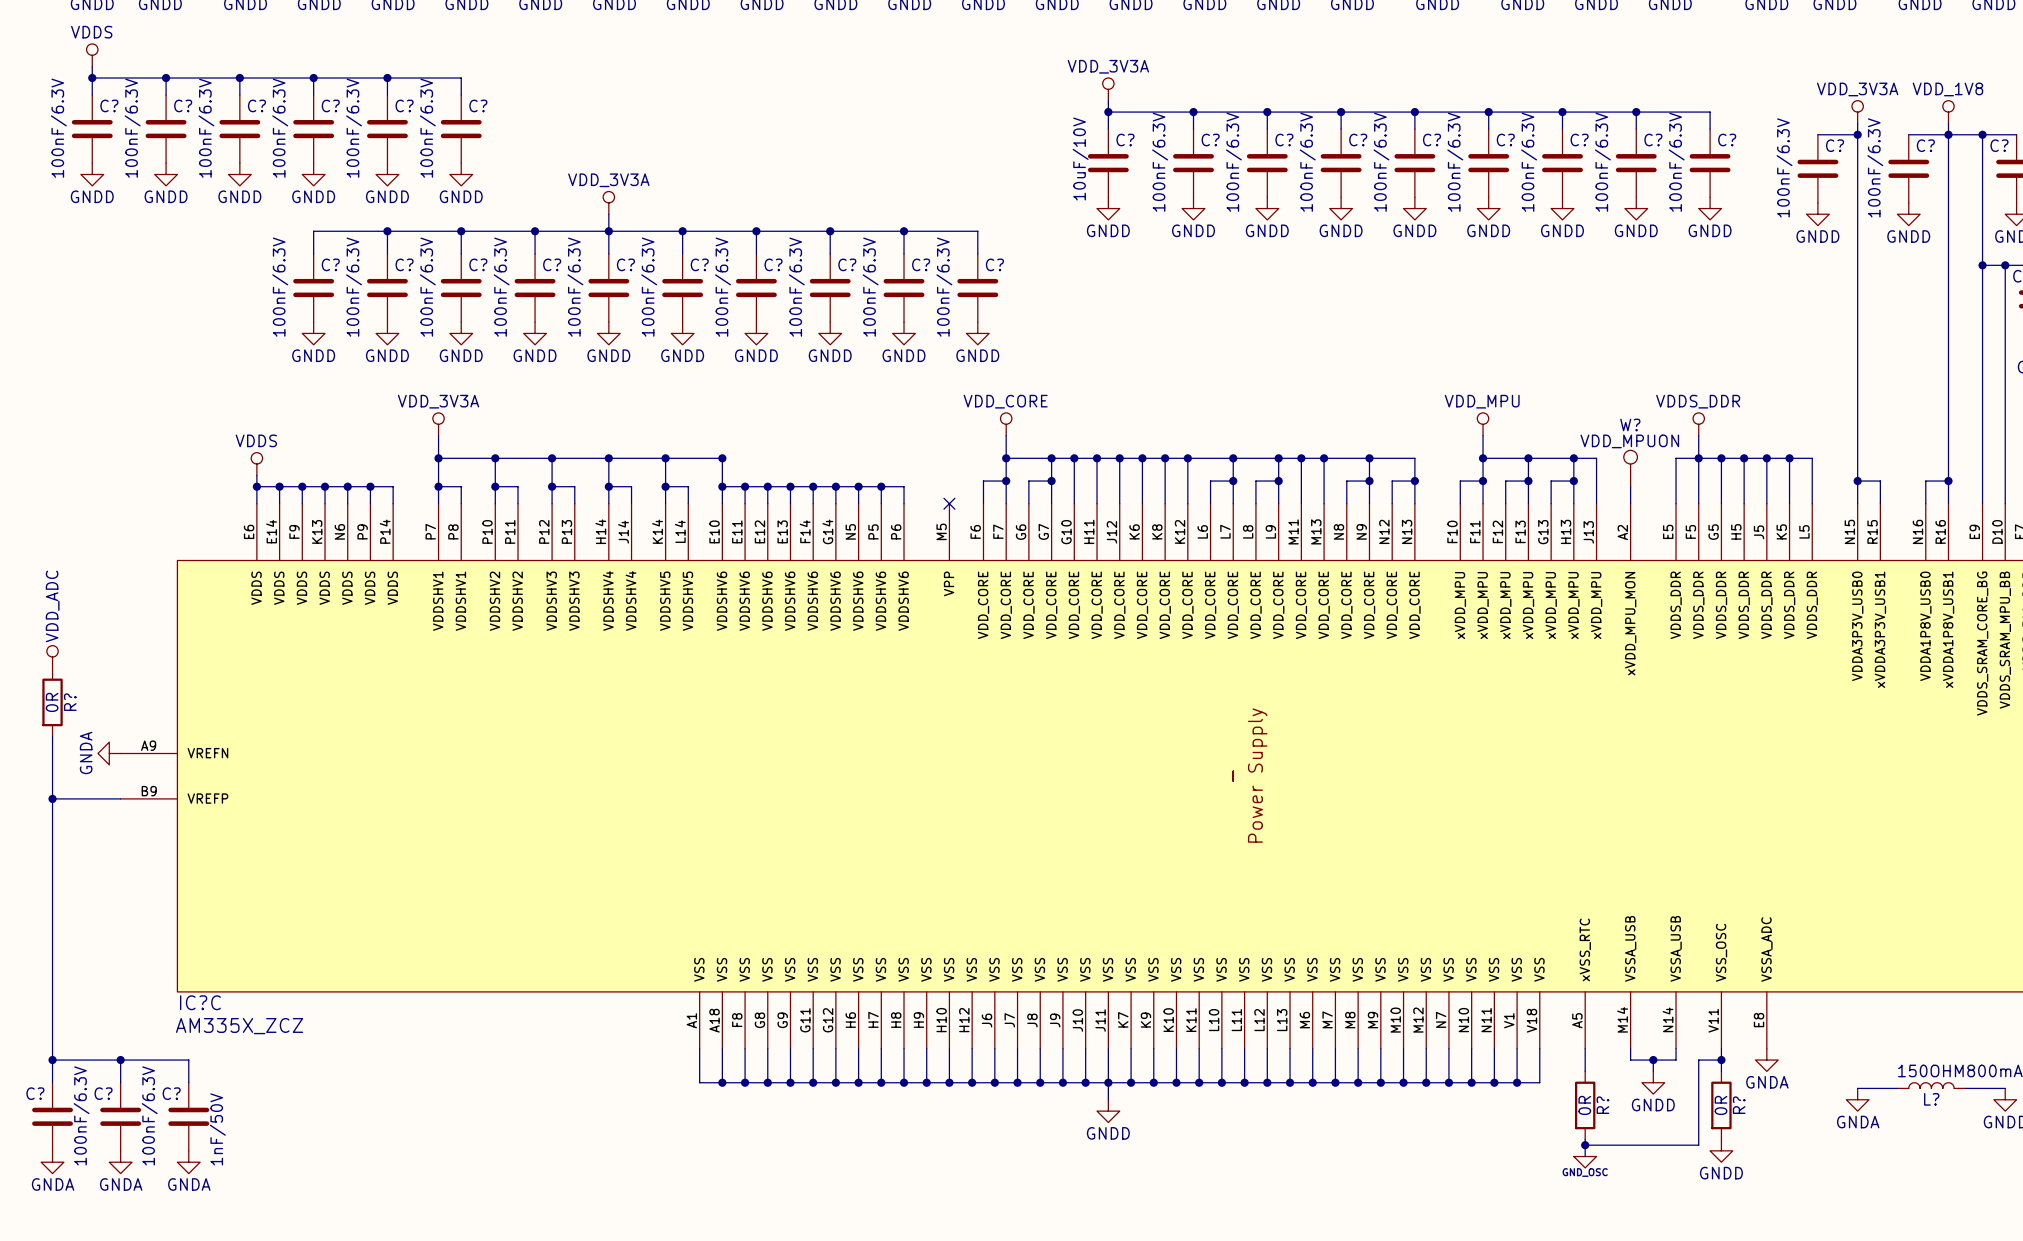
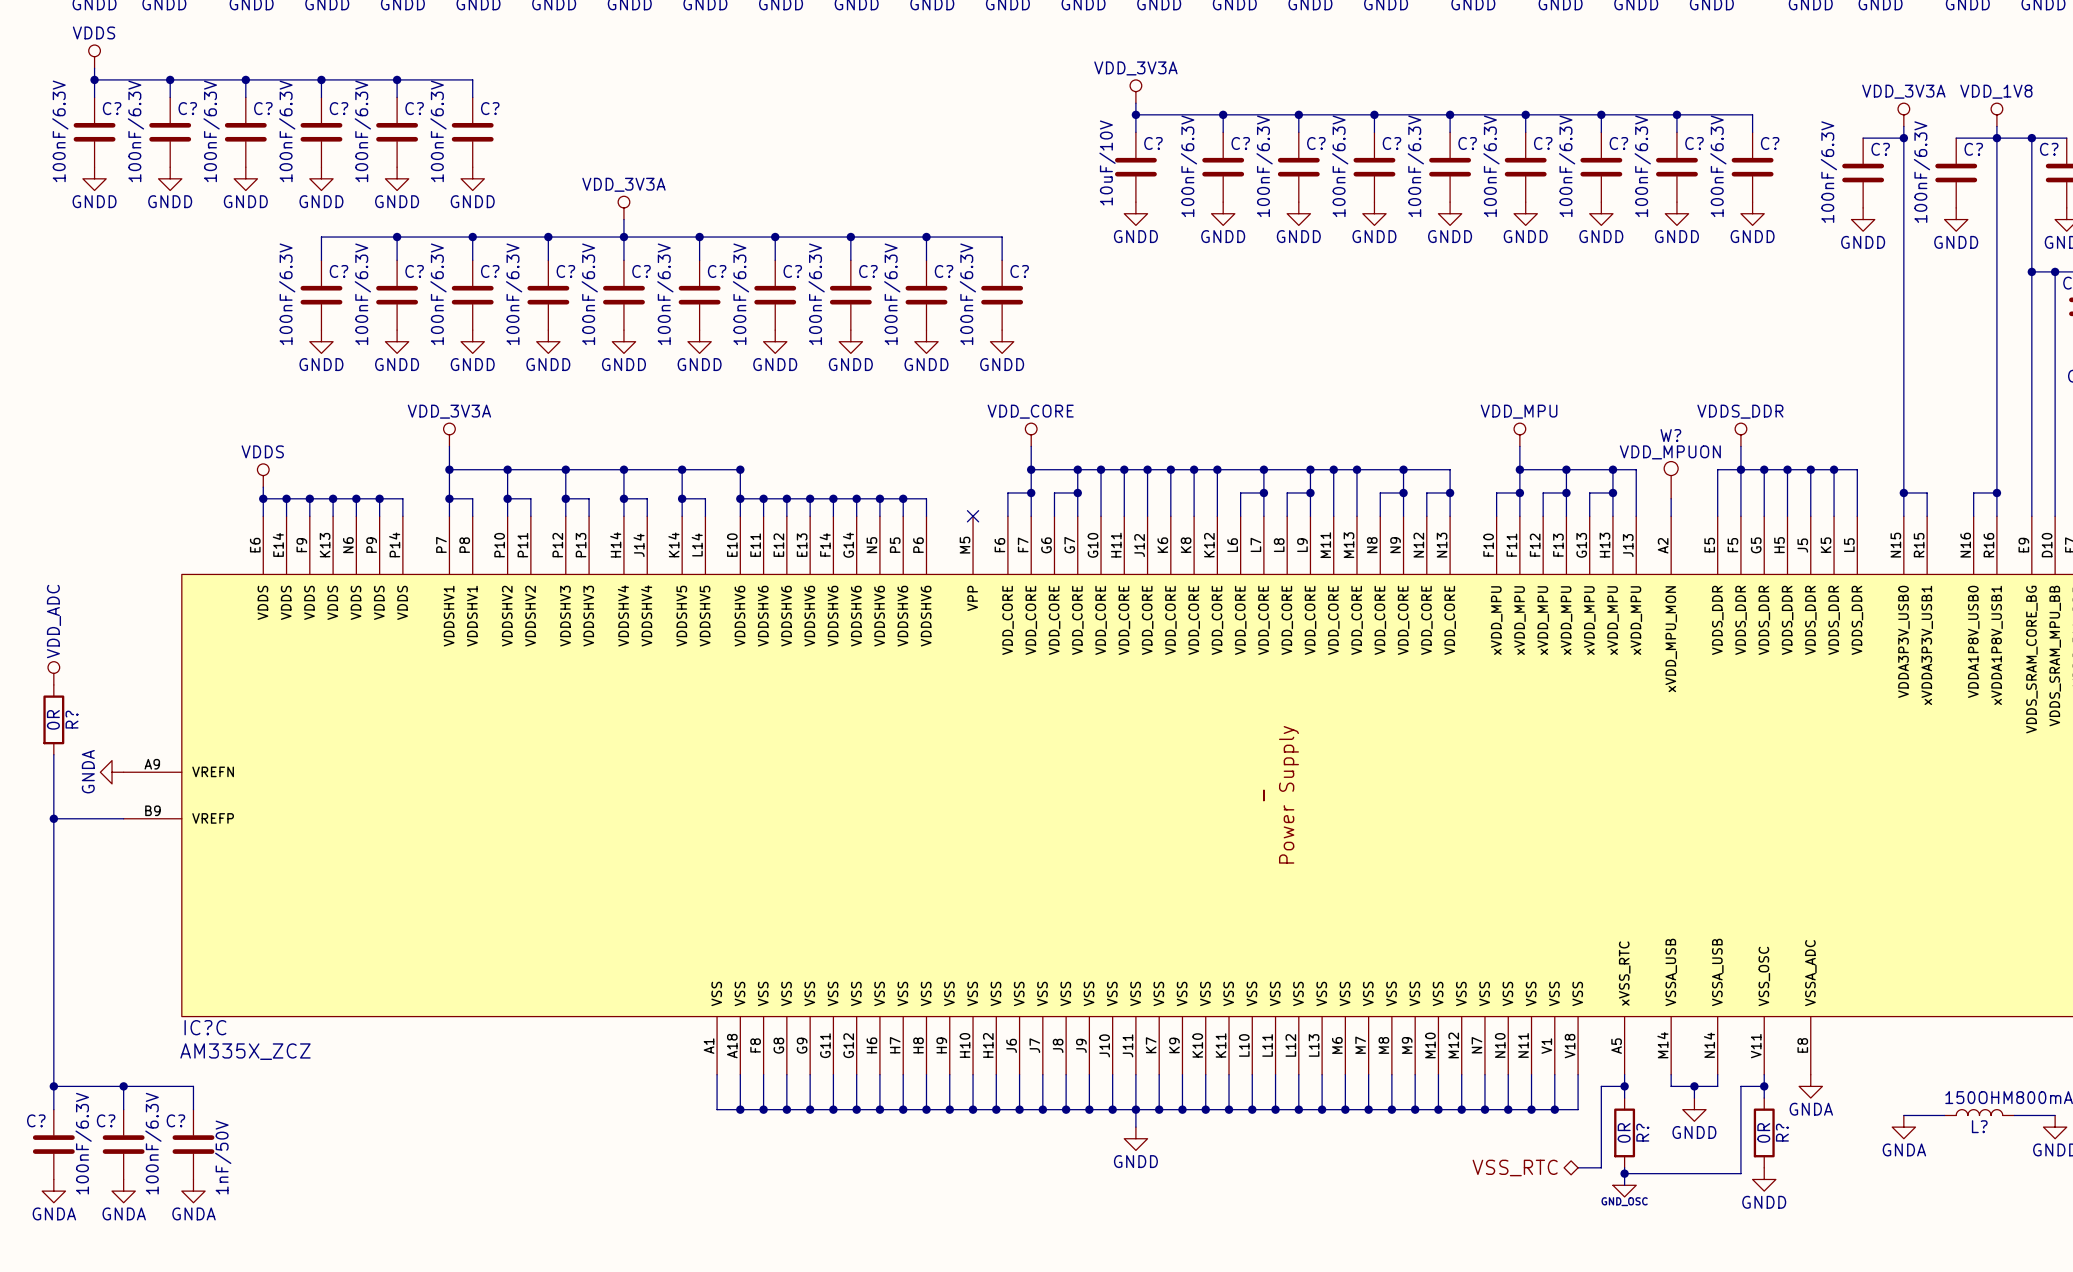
wire: none -> (1624, 1086) (1601, 1086) (1601, 1167) (1578, 1167)
junction: none -> (1624, 1086)
hierarchical label: none -> VSS_RTC (1515, 1167)

